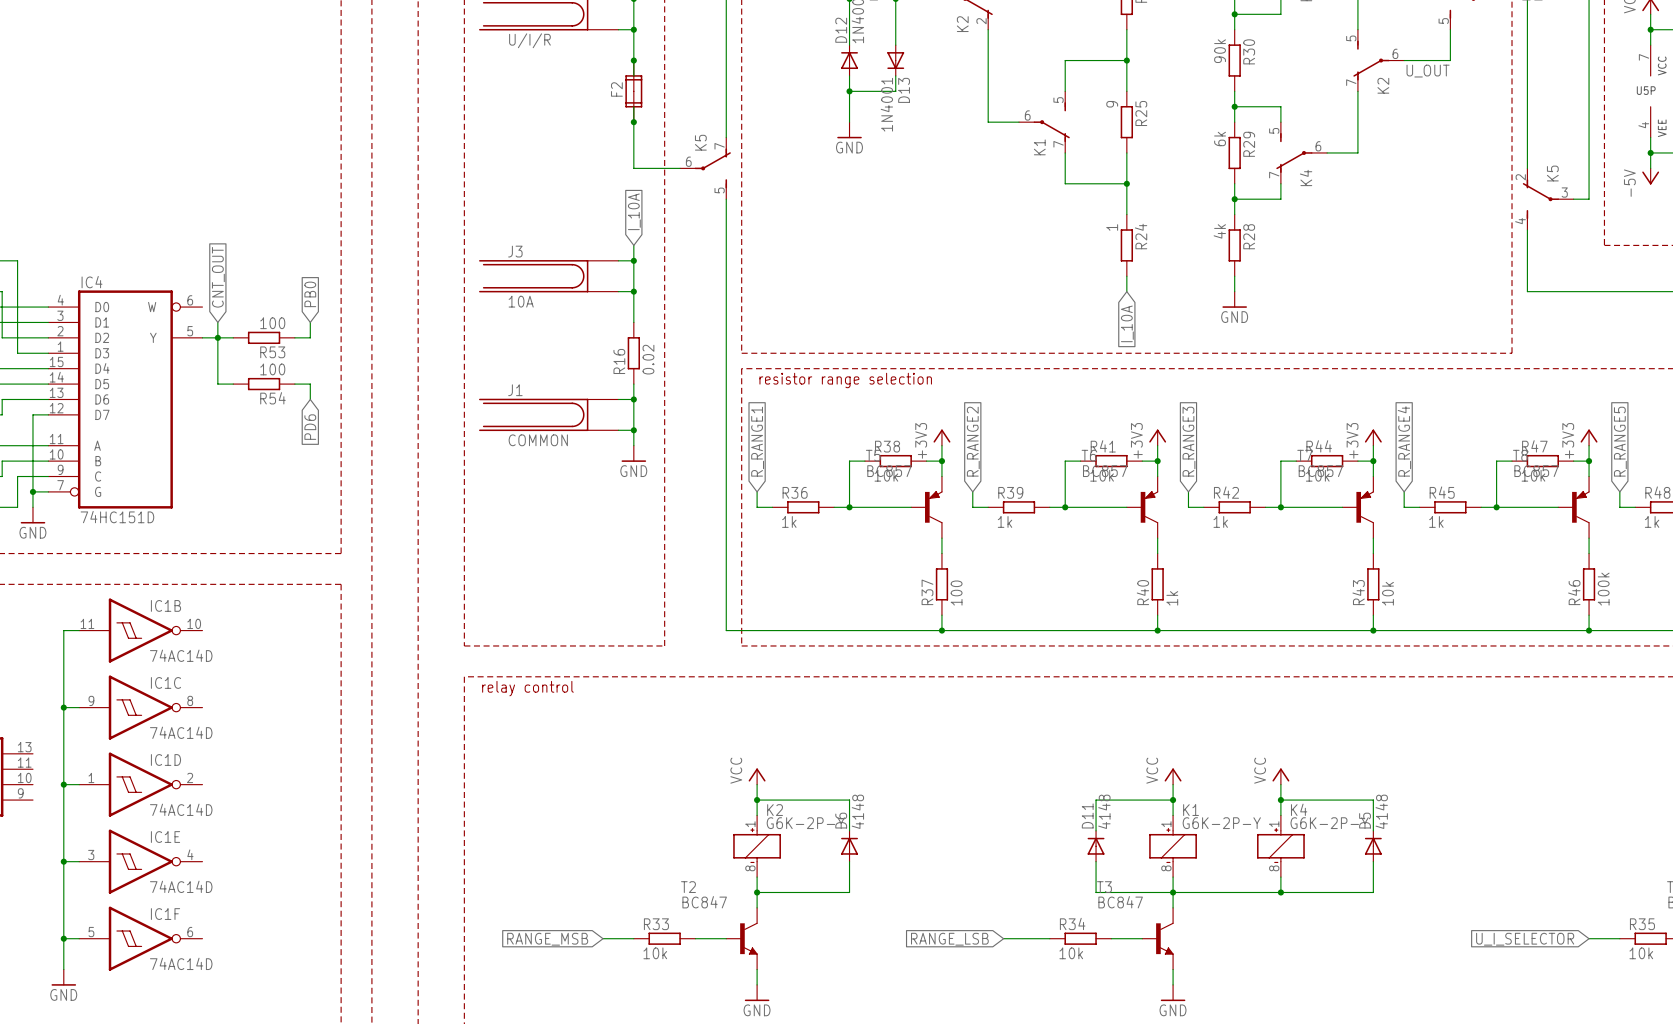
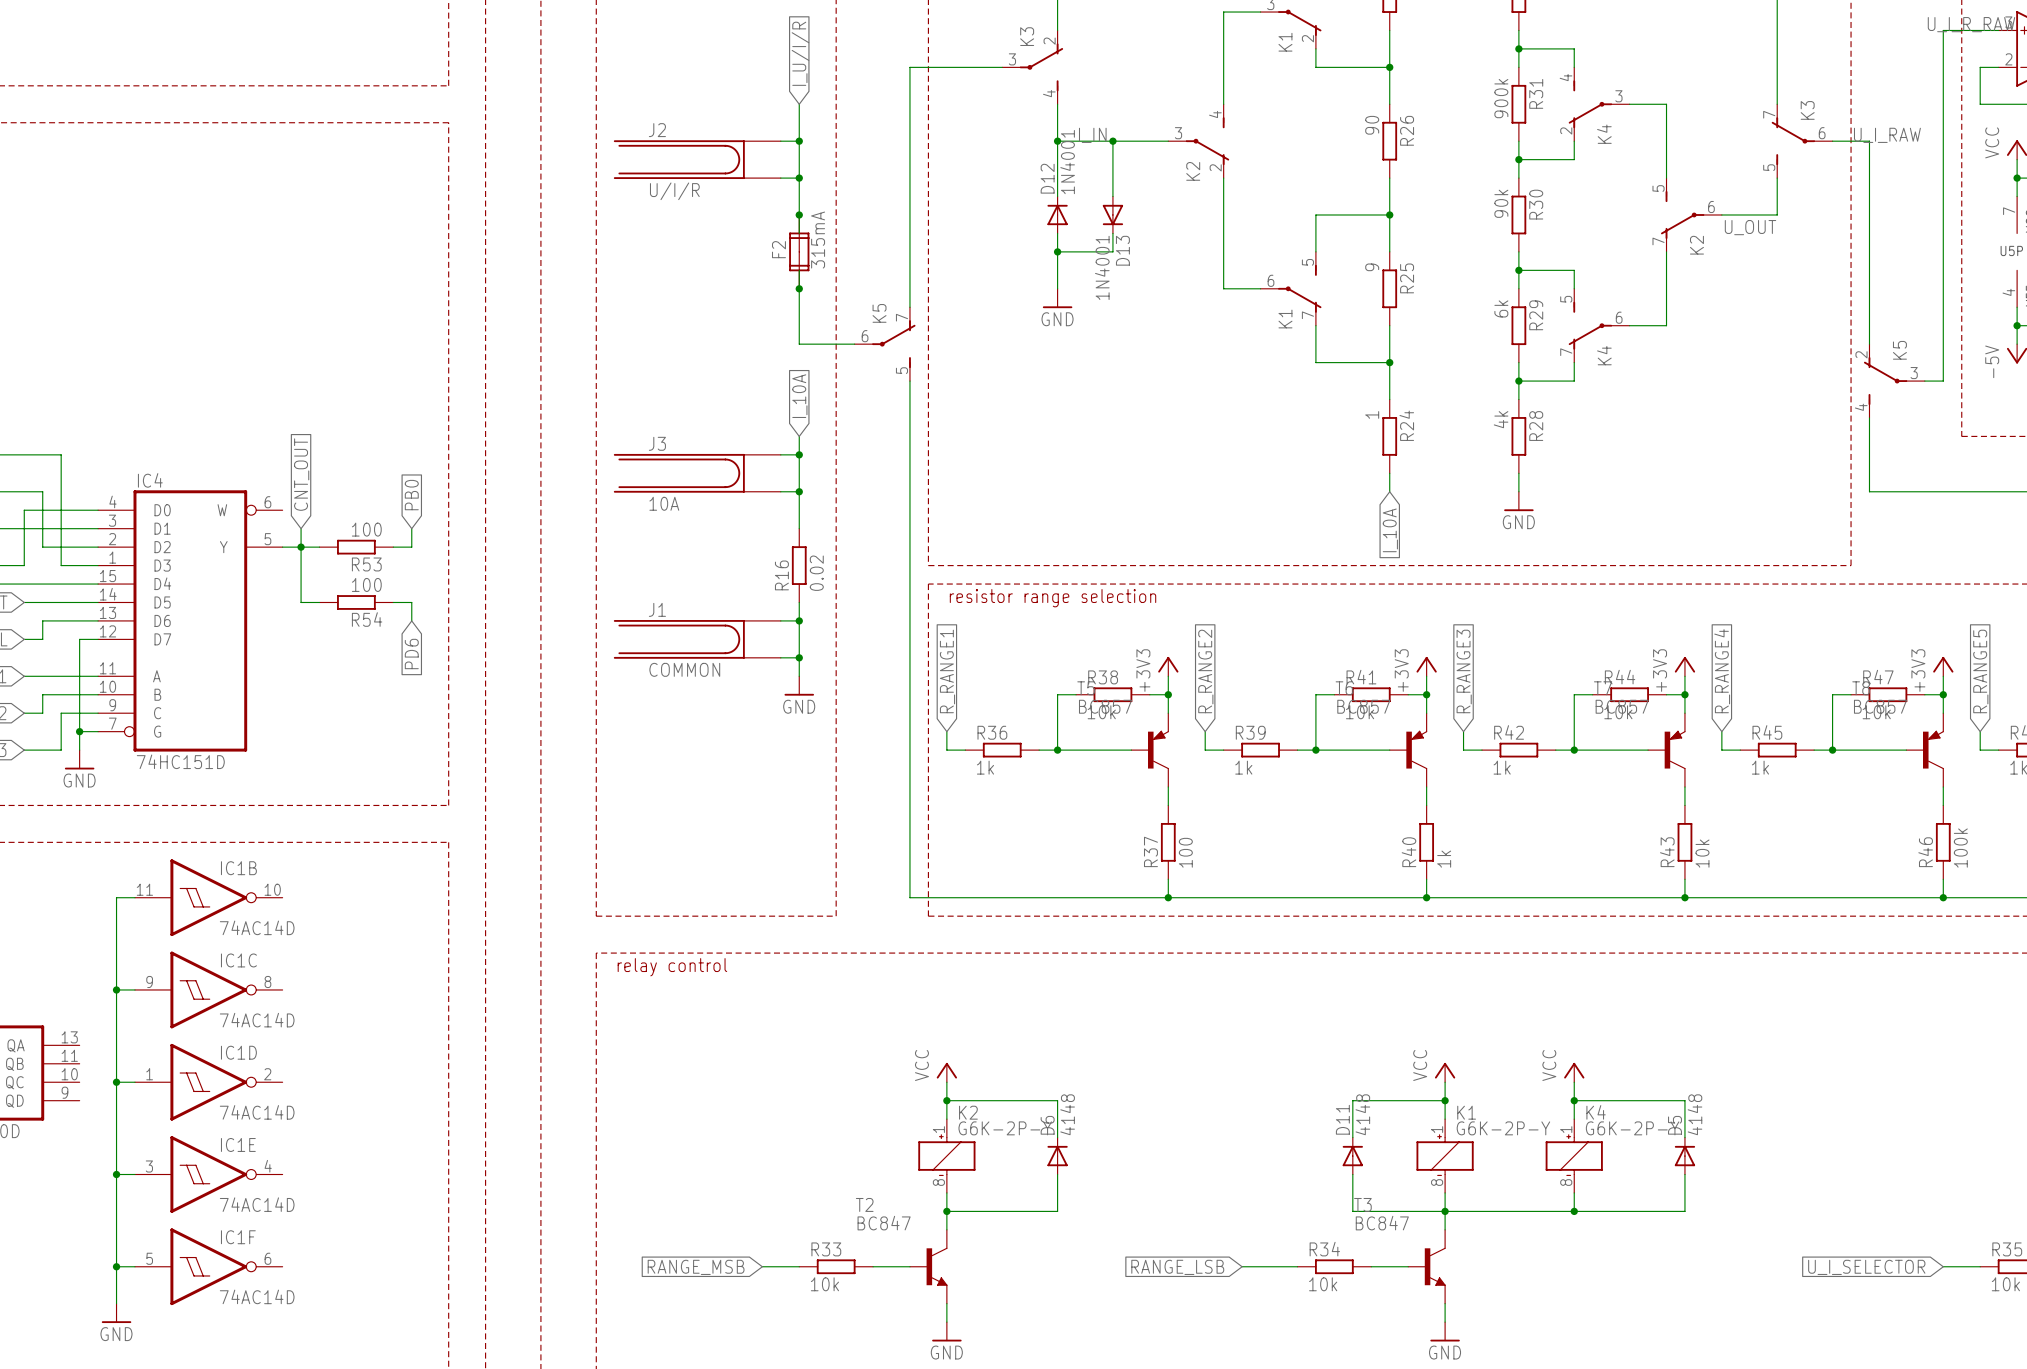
F2 value: none -> 315mA (818, 240)

